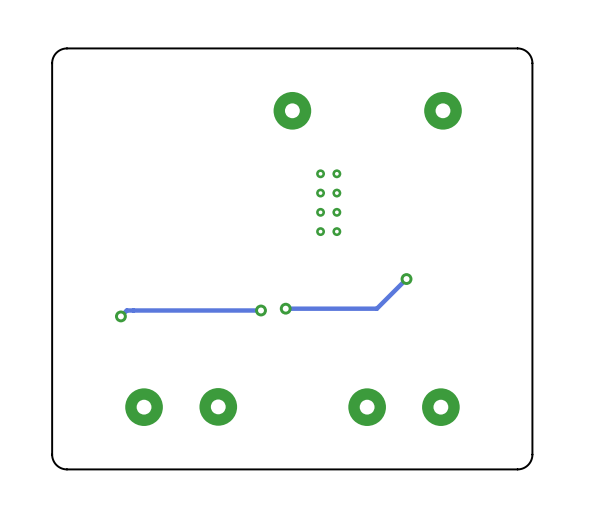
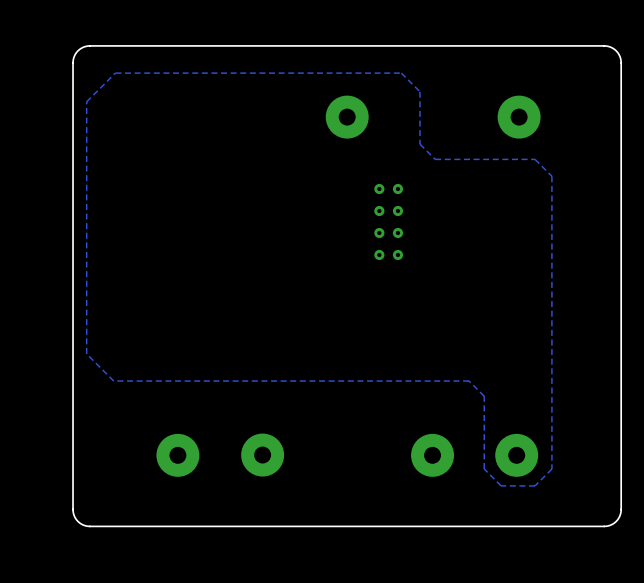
zone outline: none -> (401, 73) (115, 73) (86, 101) (86, 353) (113, 381) (469, 381) (484, 396) (484, 469) (501, 485) (535, 485) (551, 469) (551, 176) (535, 159) (435, 159) (419, 144) (419, 91) (401, 73)
track: (406, 279) (376, 308) (285, 308) -> none
via: (406, 279) -> none
via: (285, 308) -> none
track: (260, 310) (126, 310) (120, 316) -> none
via: (260, 310) -> none
via: (120, 316) -> none

